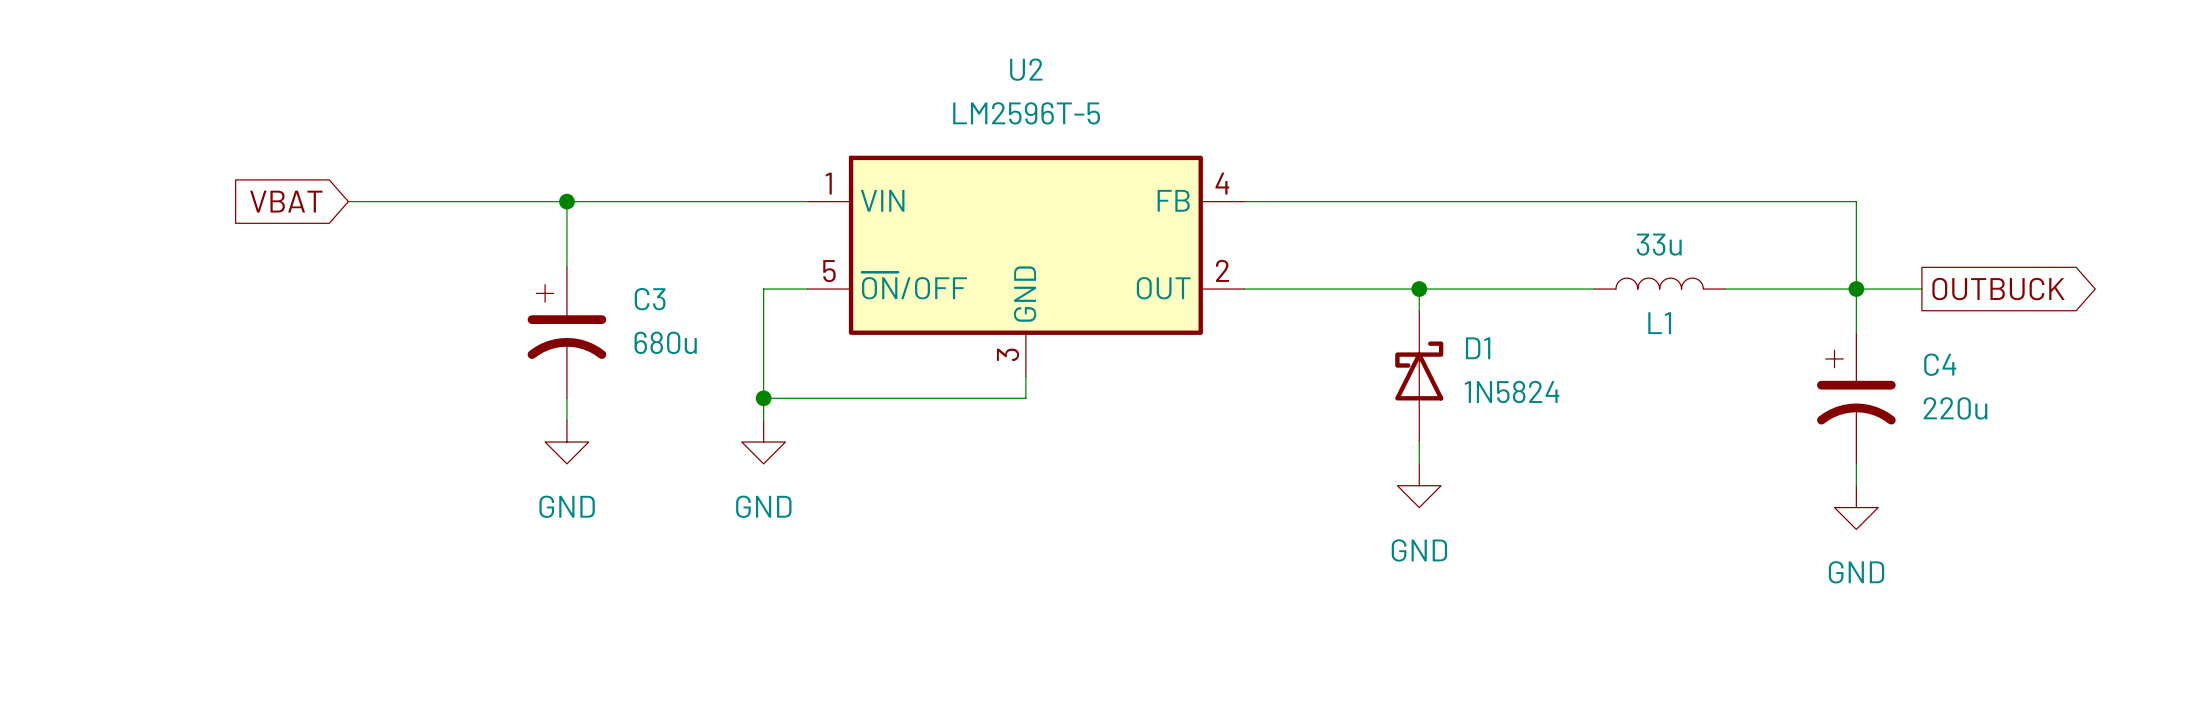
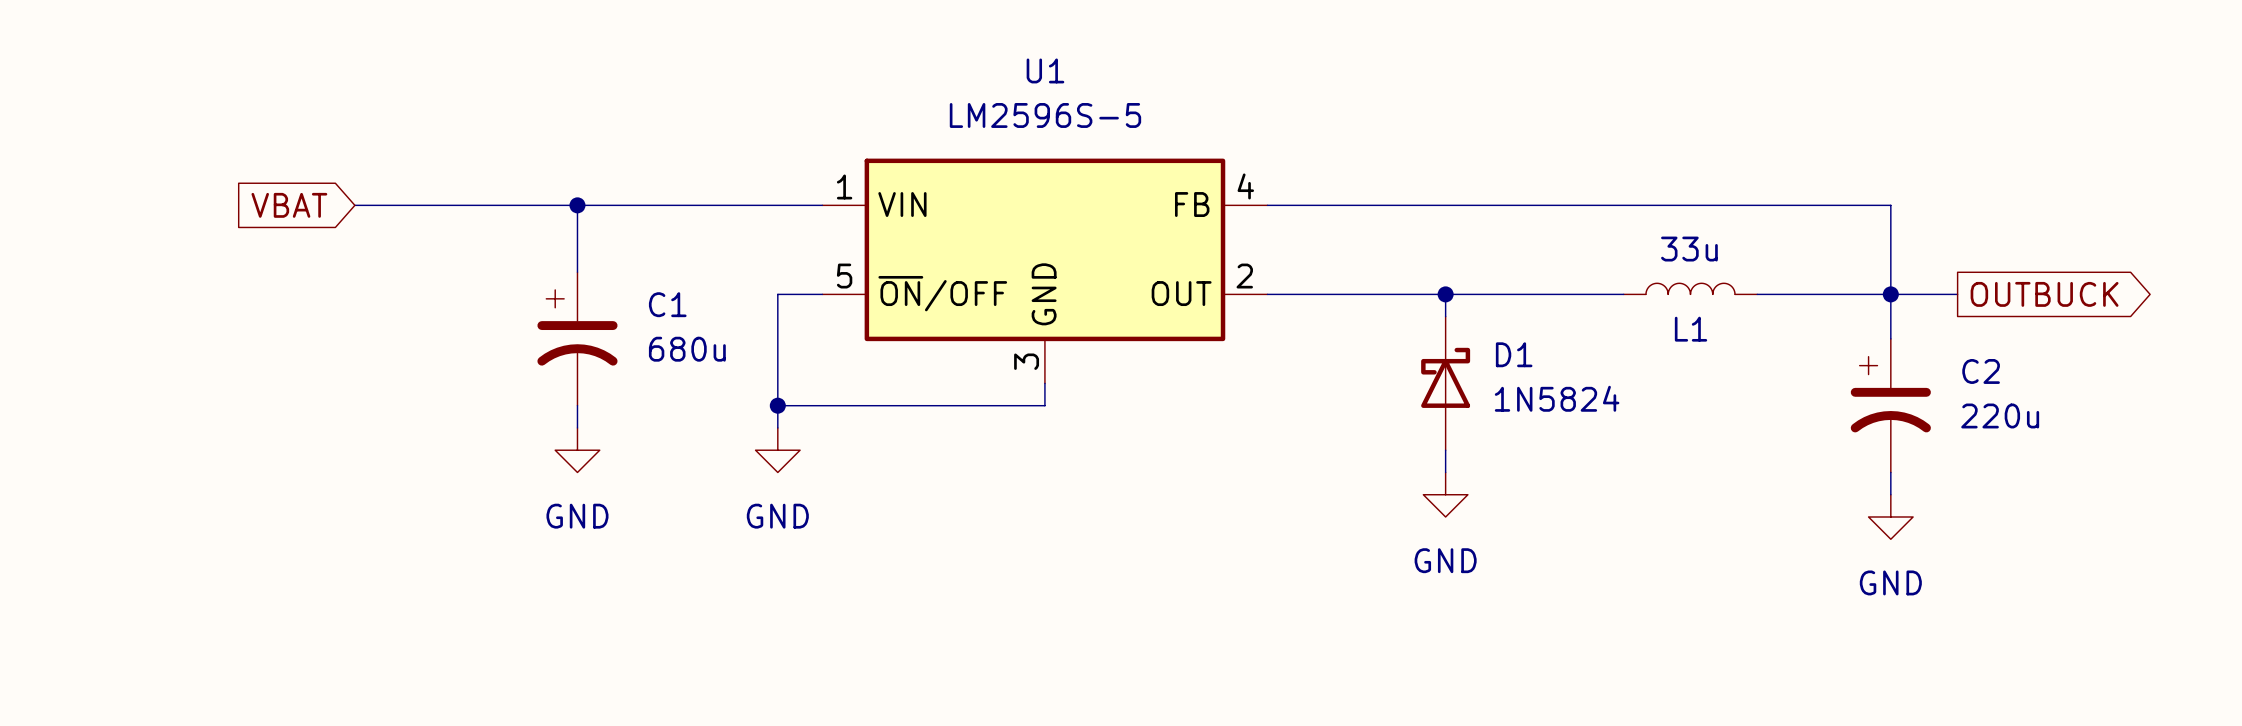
U2 name: U2 (1026, 69) -> U1 (1045, 70)
U2 value: LM2596T-5 (1026, 113) -> LM2596S-5 (1045, 115)
C3 name: C3 (650, 299) -> C1 (667, 304)
C4 name: C4 (1940, 364) -> C2 (1981, 371)

